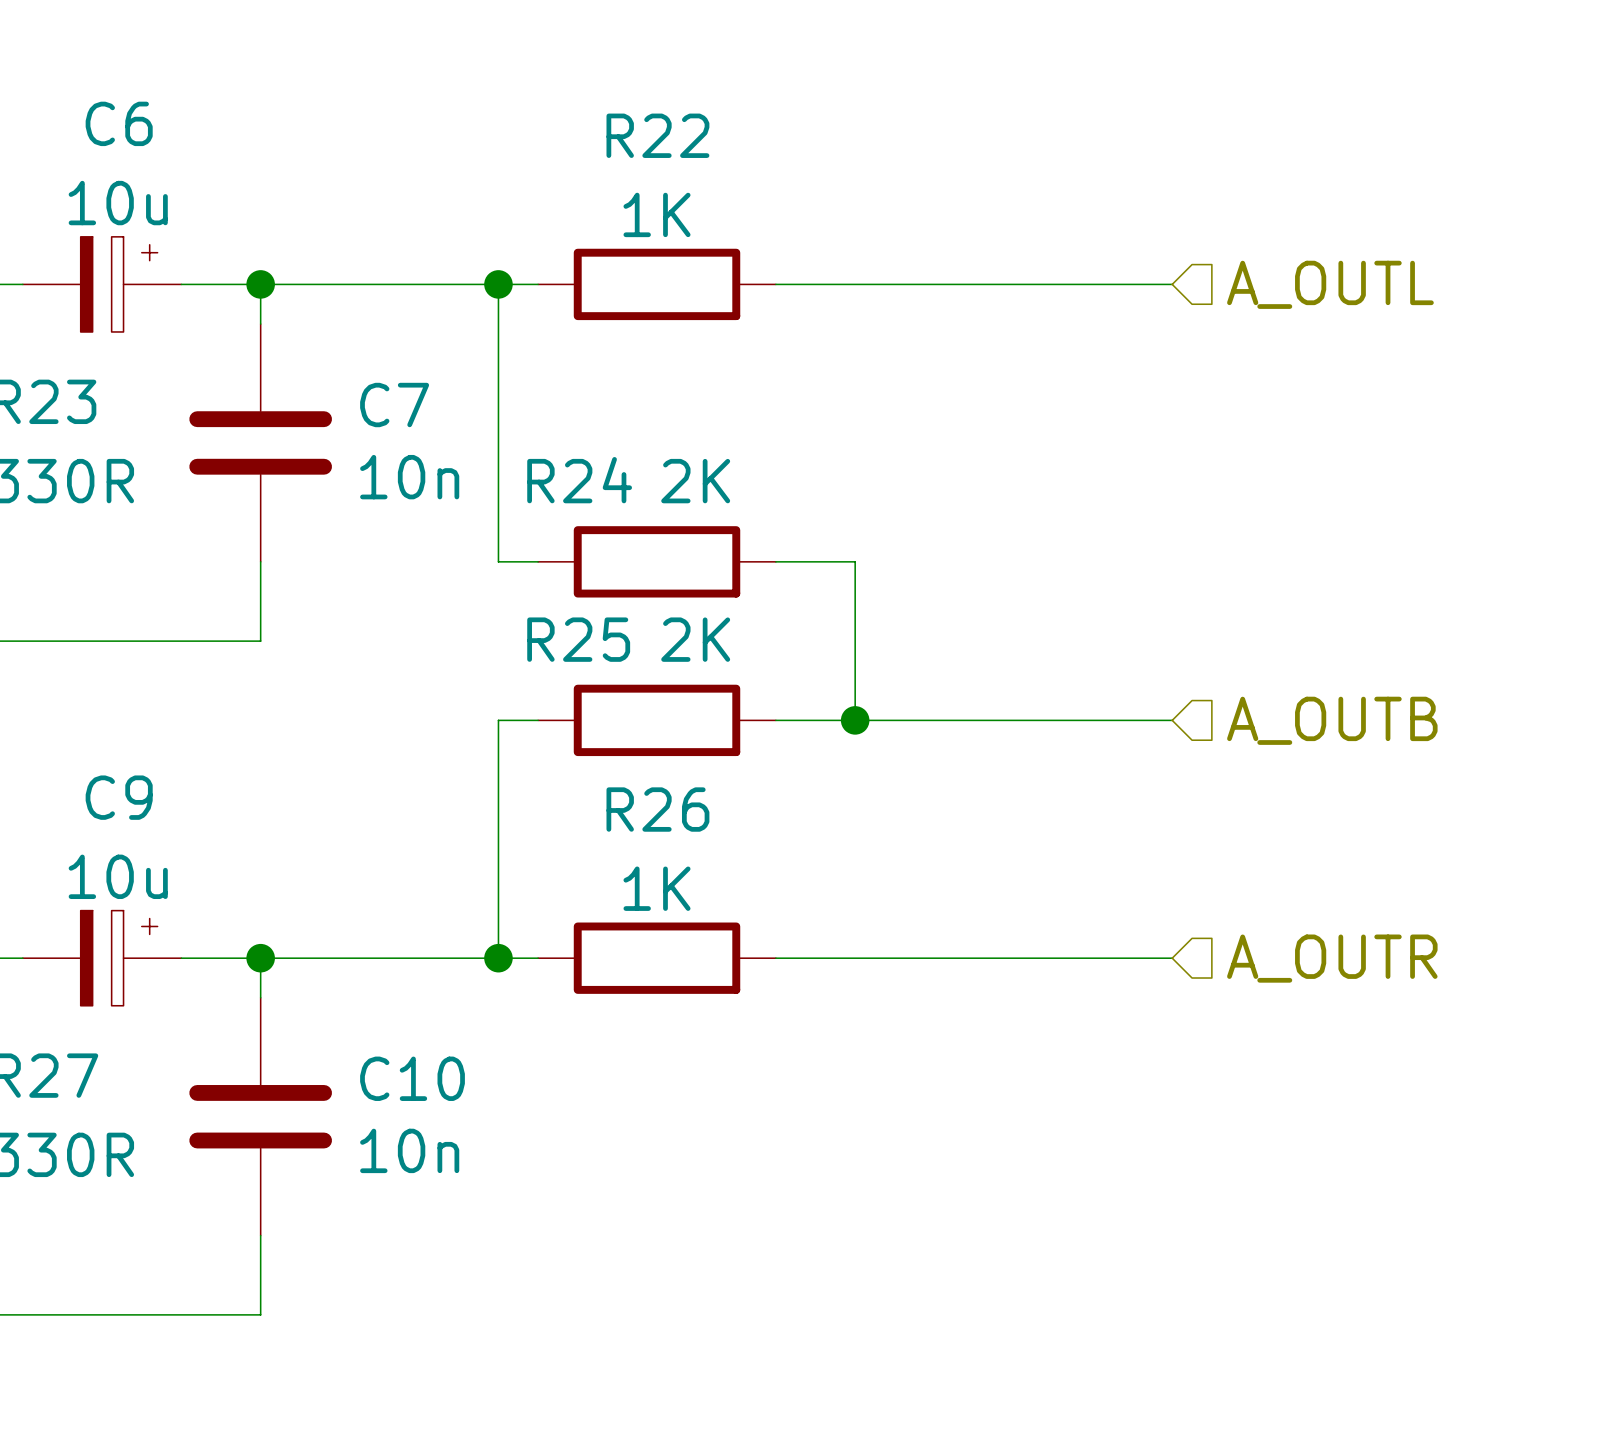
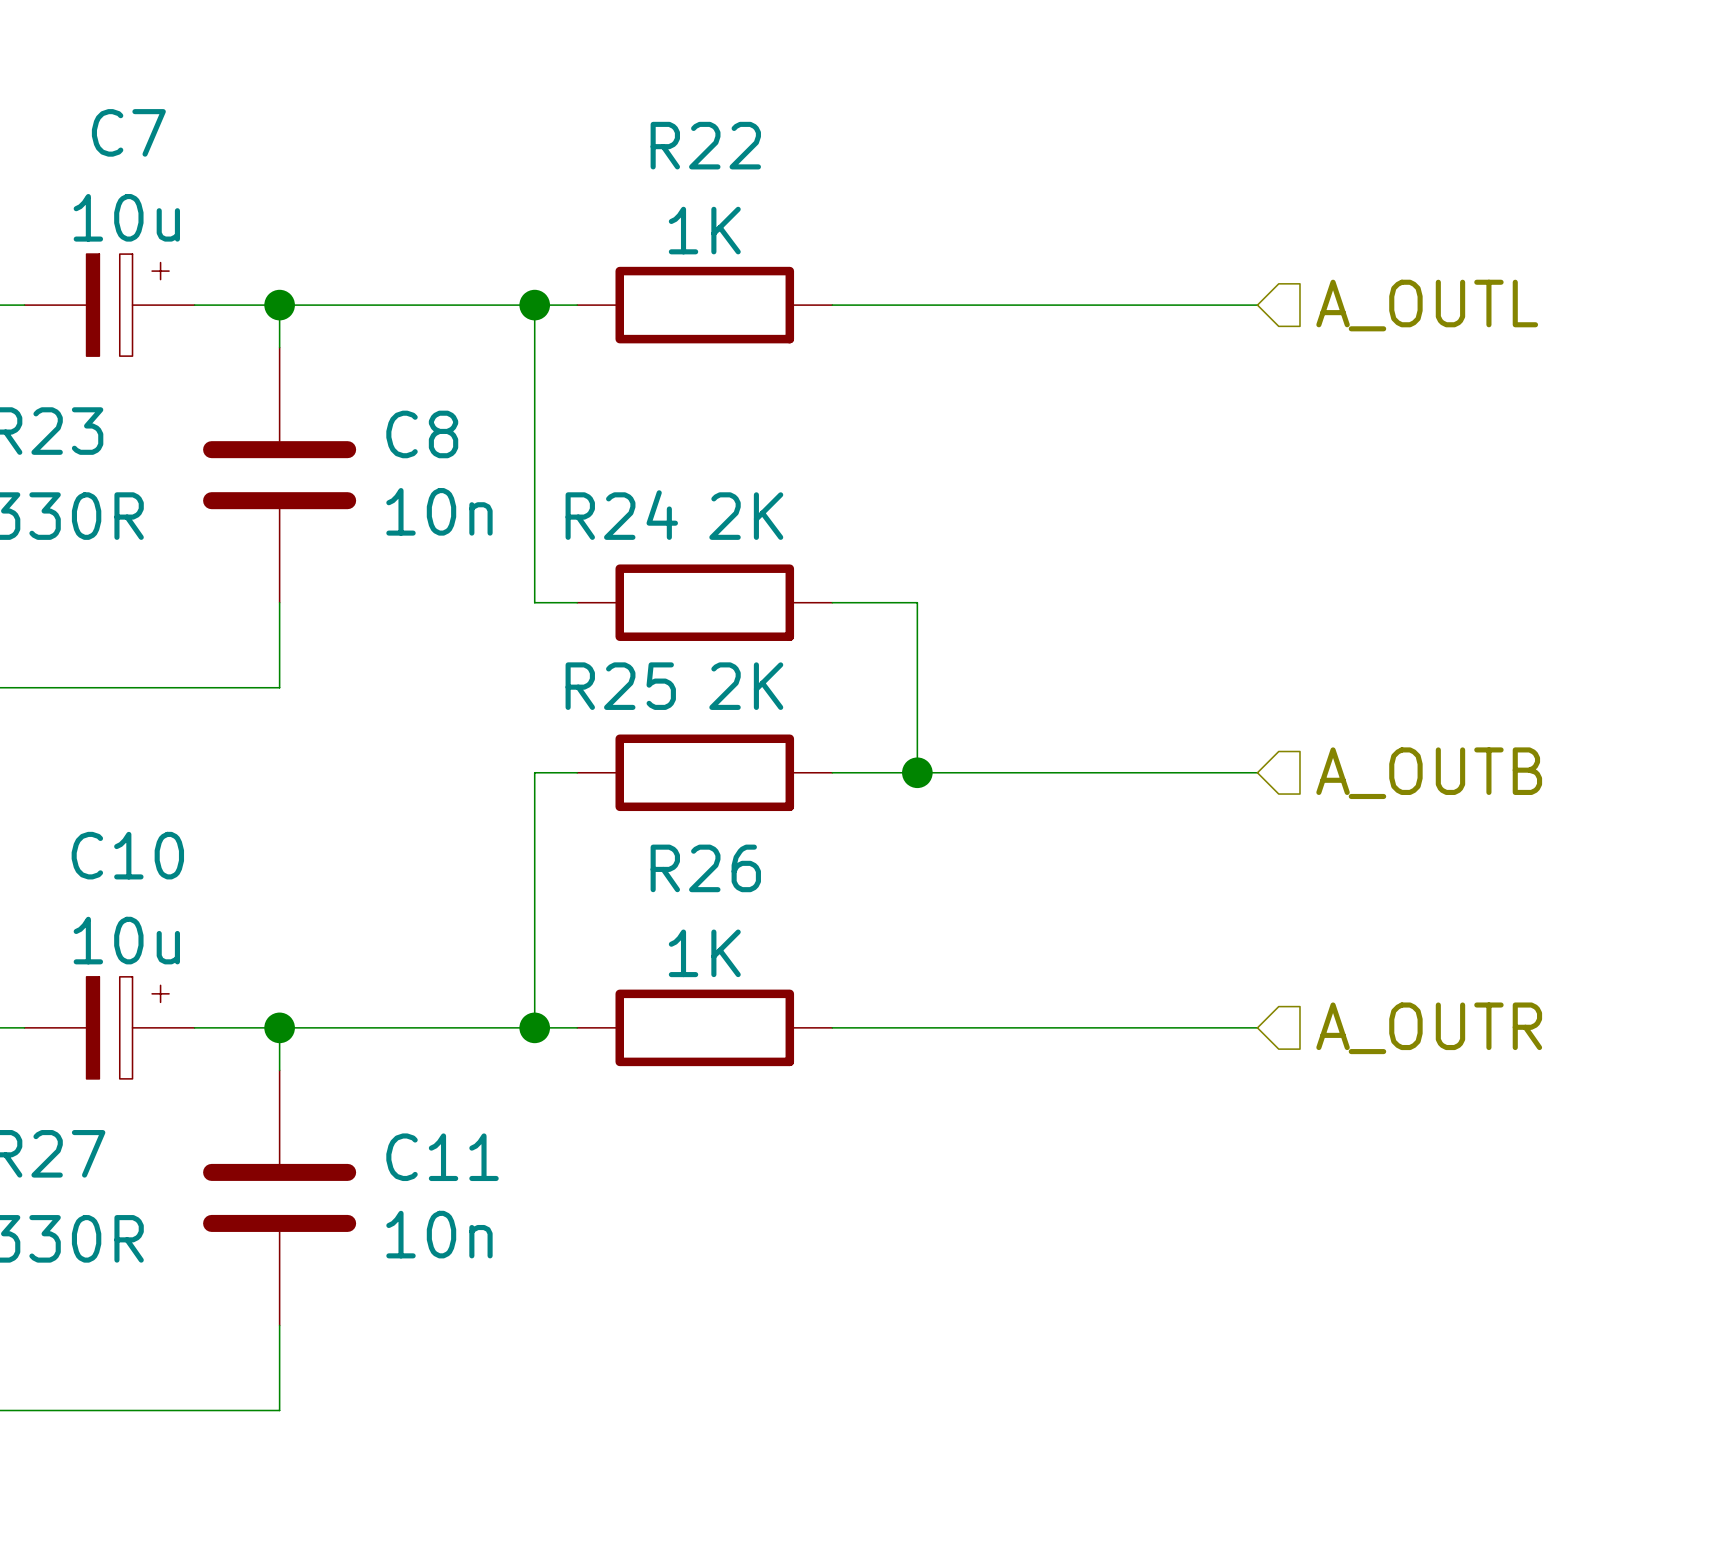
C6 name: C6 (119, 123) -> C7 (128, 132)
C7 name: C7 (394, 405) -> C8 (422, 434)
C9 name: C9 (119, 797) -> C10 (127, 855)
C10 name: C10 (412, 1078) -> C11 (442, 1157)

